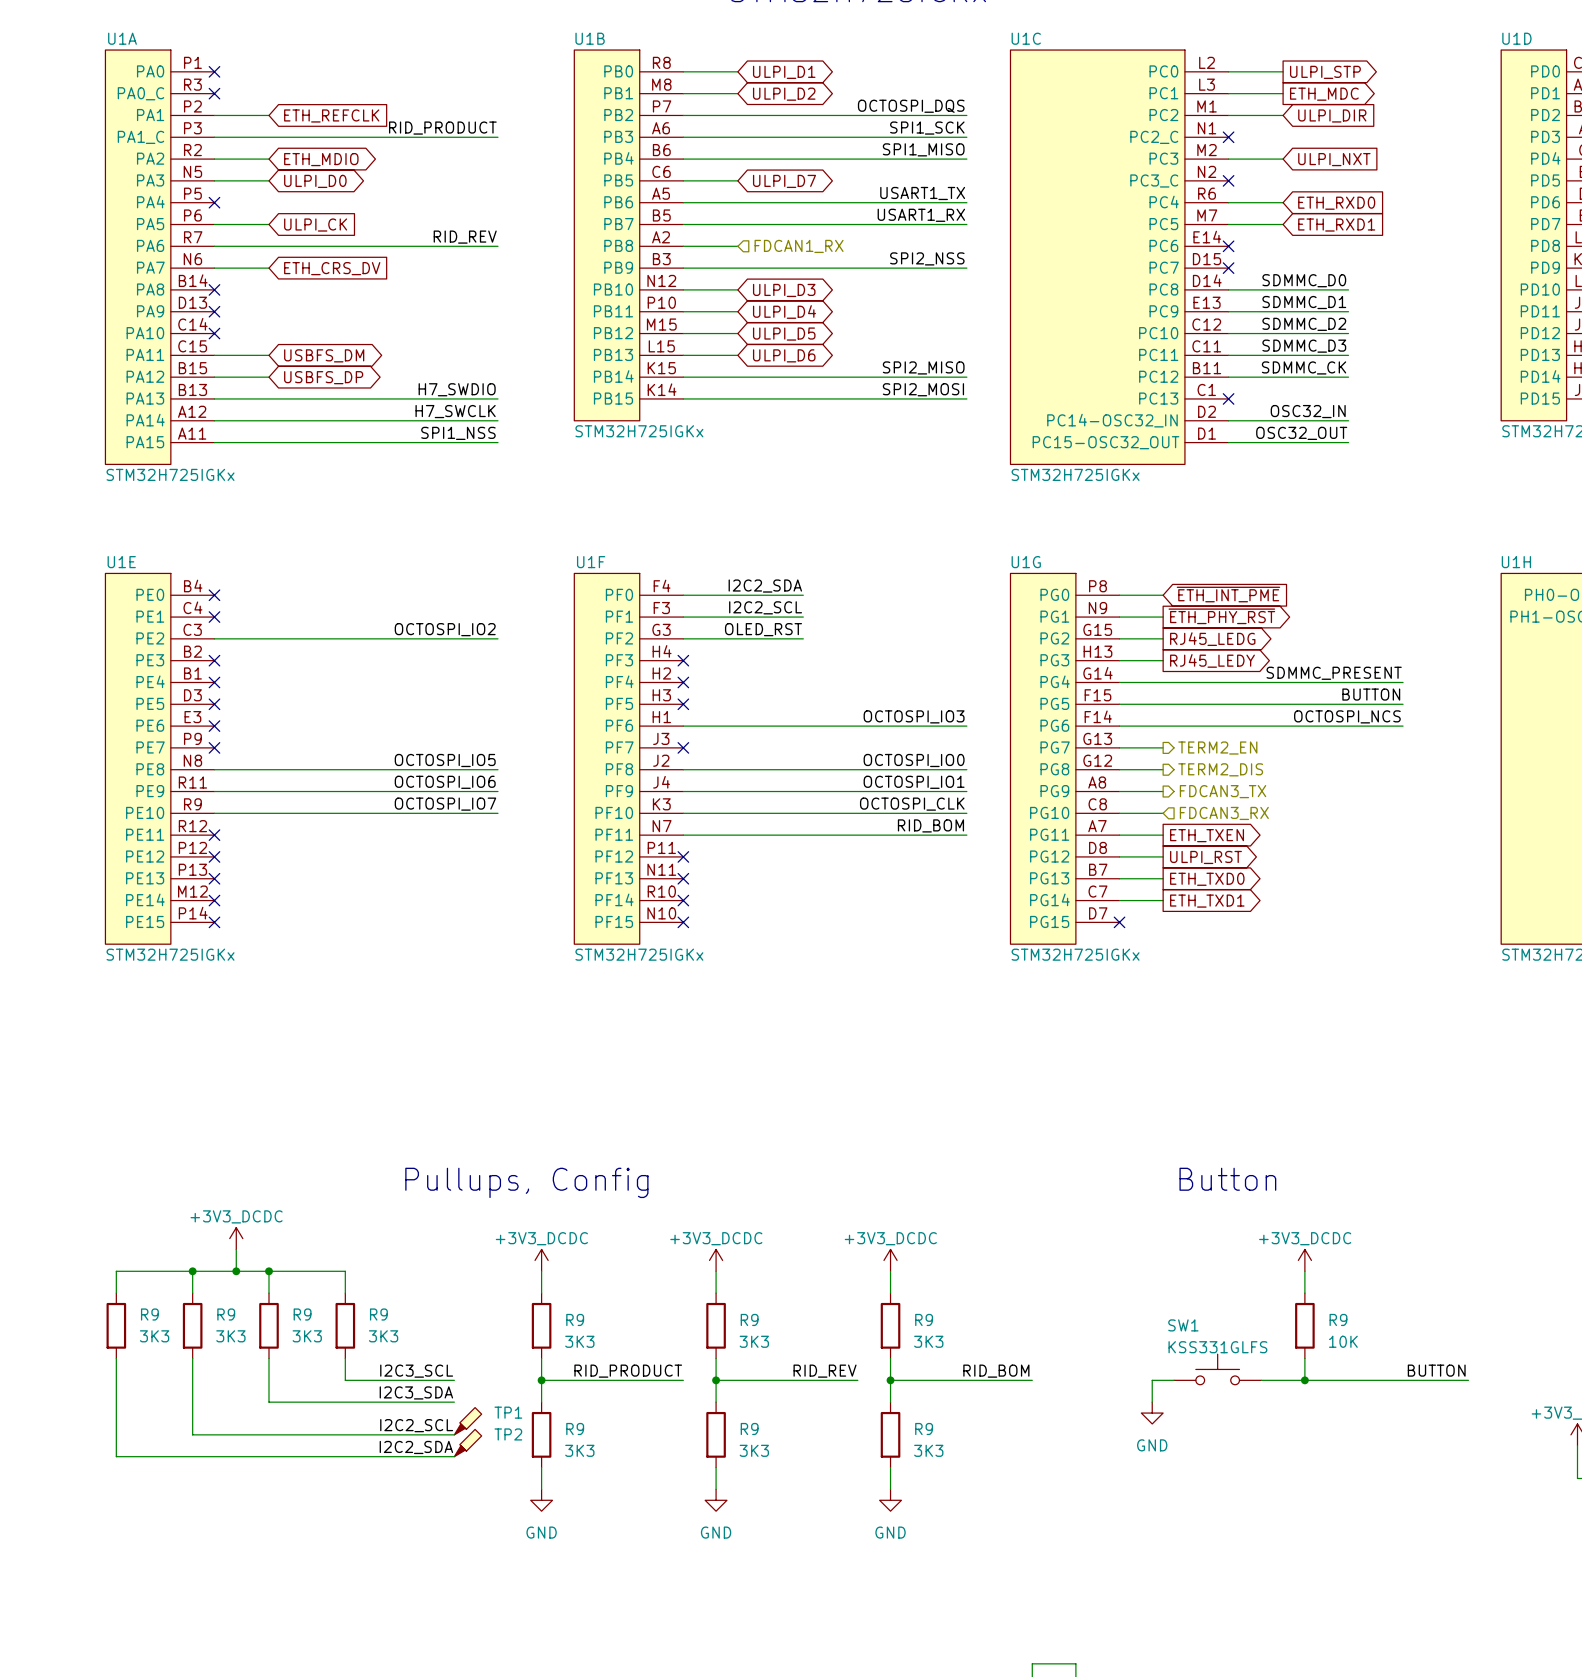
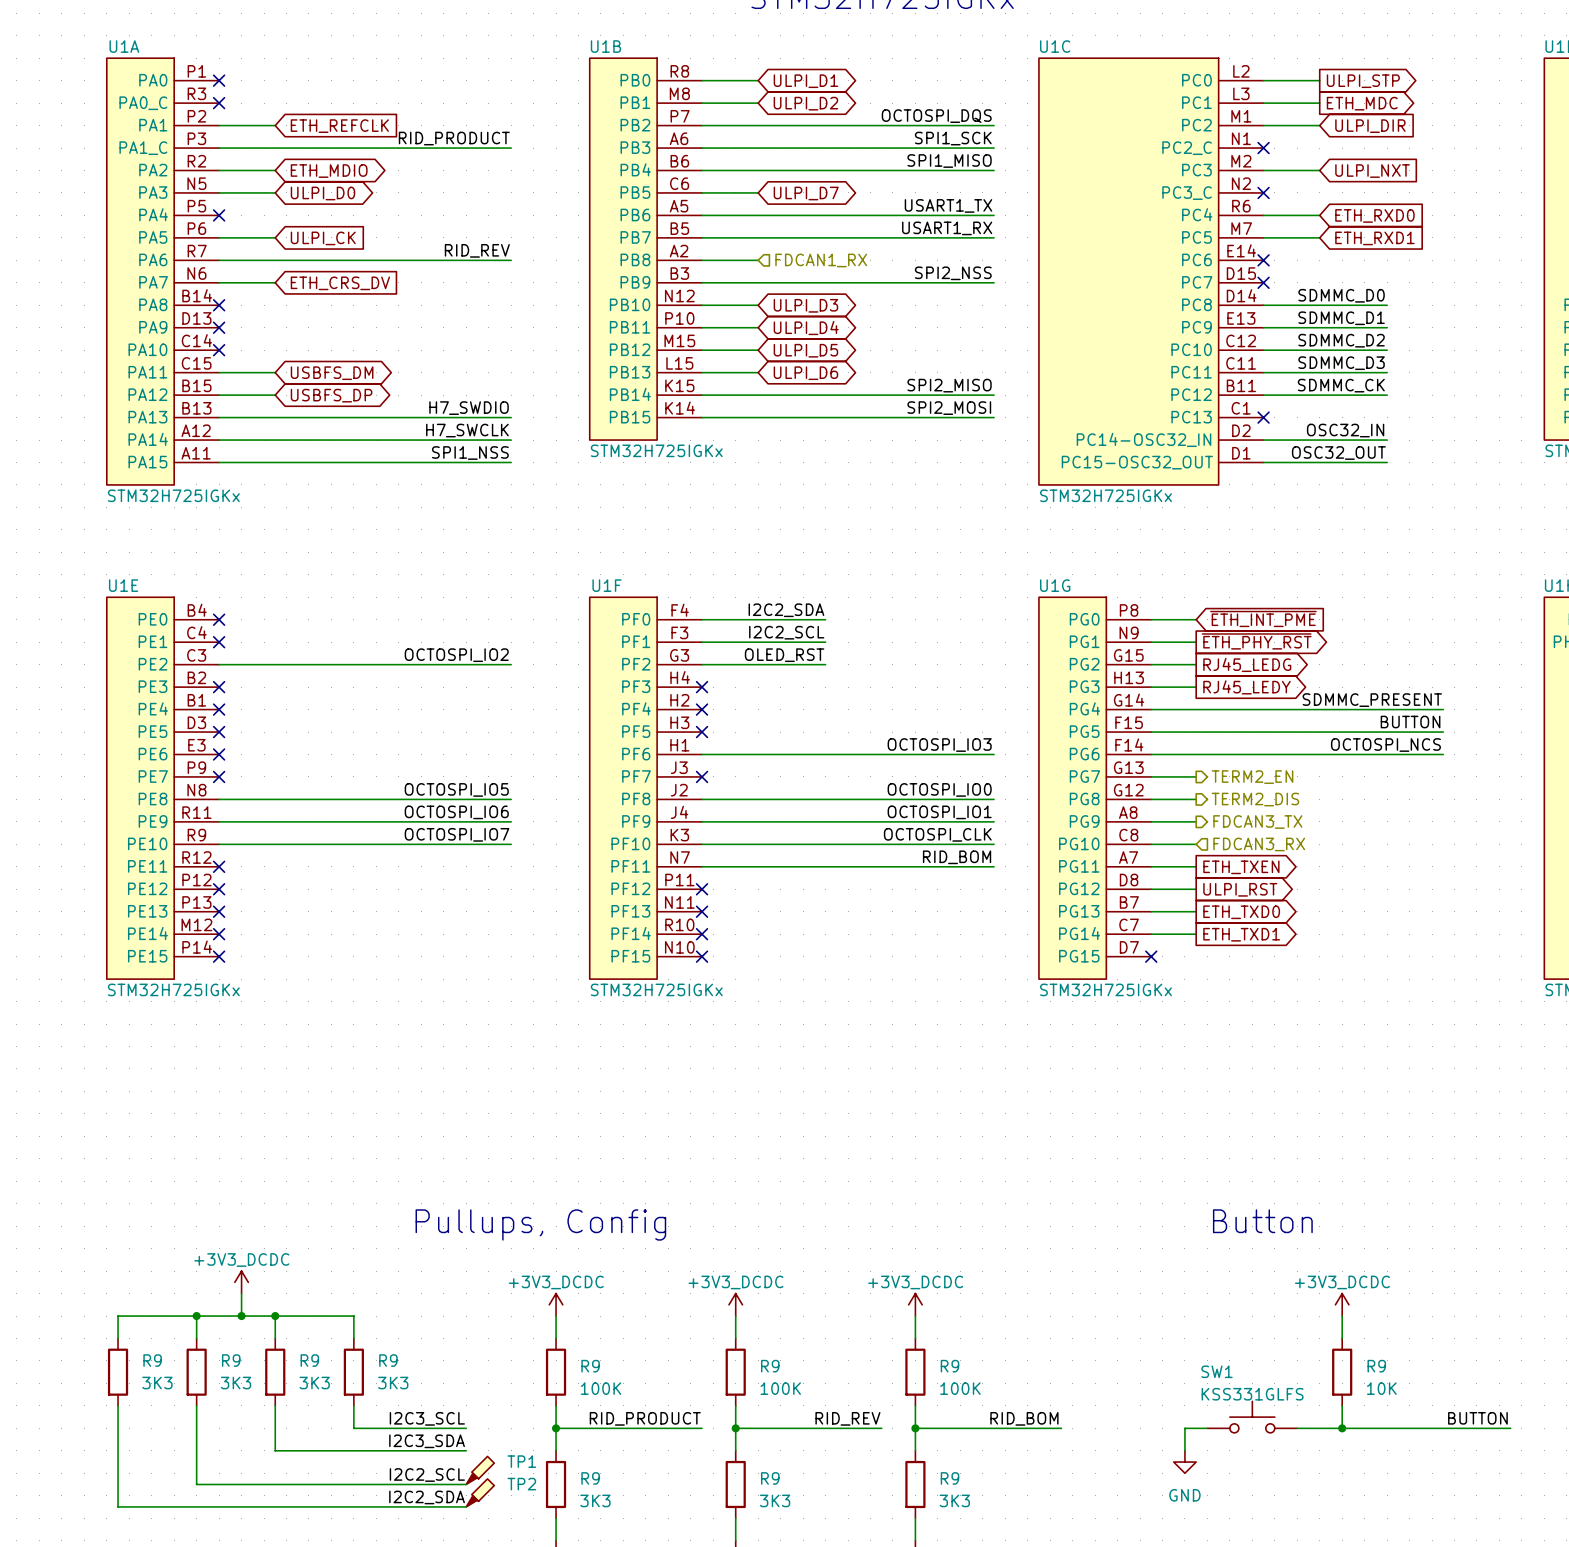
R9 value: 3K3 (579, 1341) -> 100K (601, 1388)
R9 value: 3K3 (754, 1341) -> 100K (780, 1388)
R9 value: 3K3 (928, 1341) -> 100K (960, 1388)

